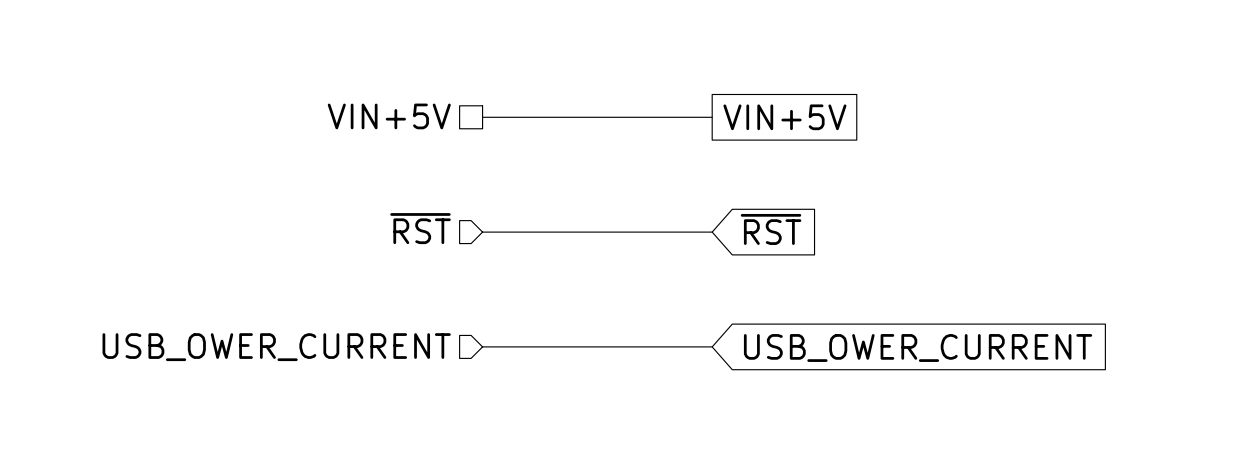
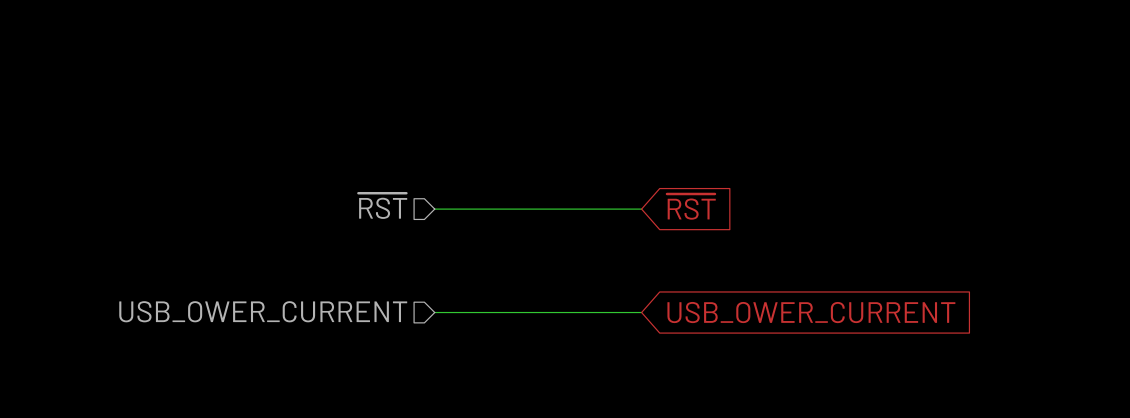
hierarchical label: VIN+5V (389, 116) -> none
wire: (482, 117) (712, 117) -> none
global label: VIN+5V (784, 117) -> none

